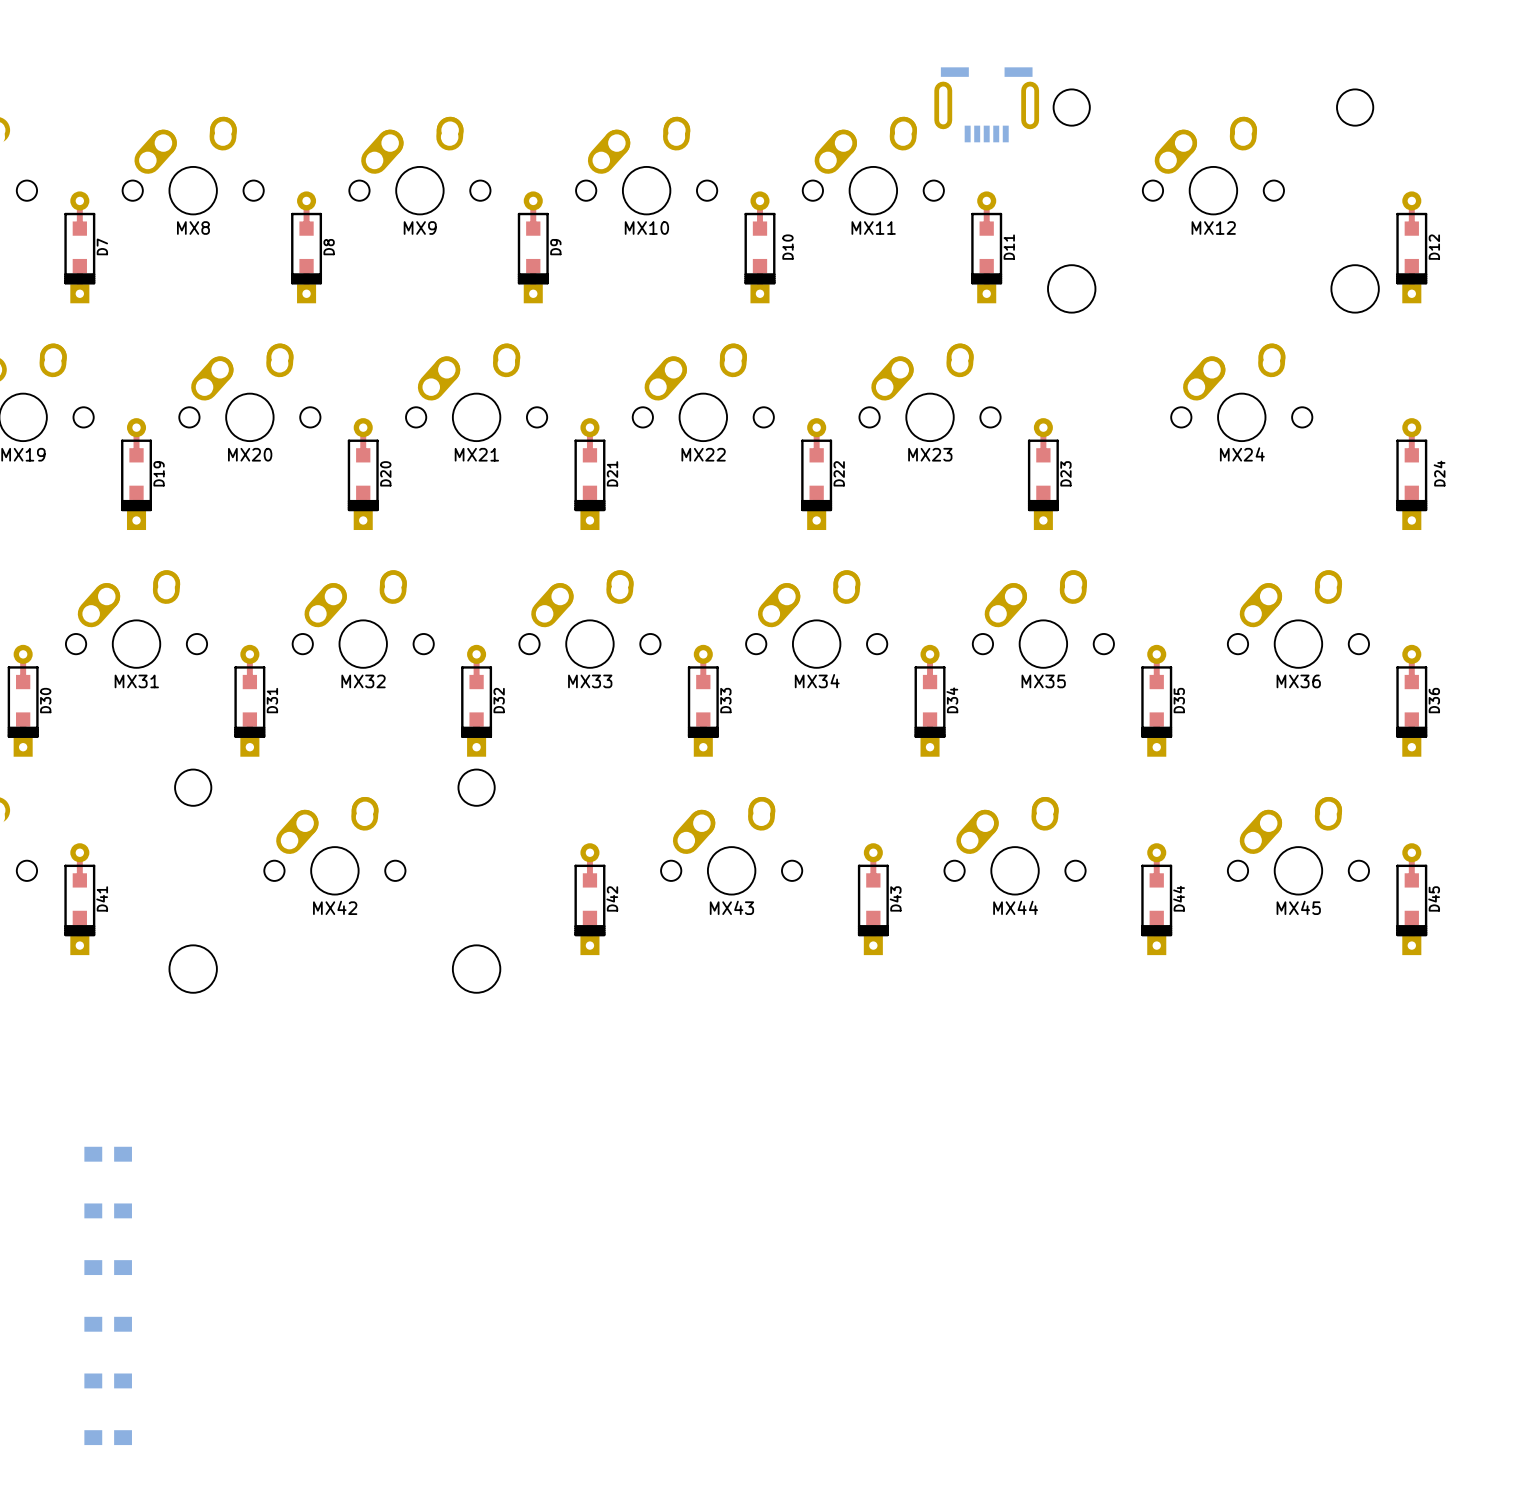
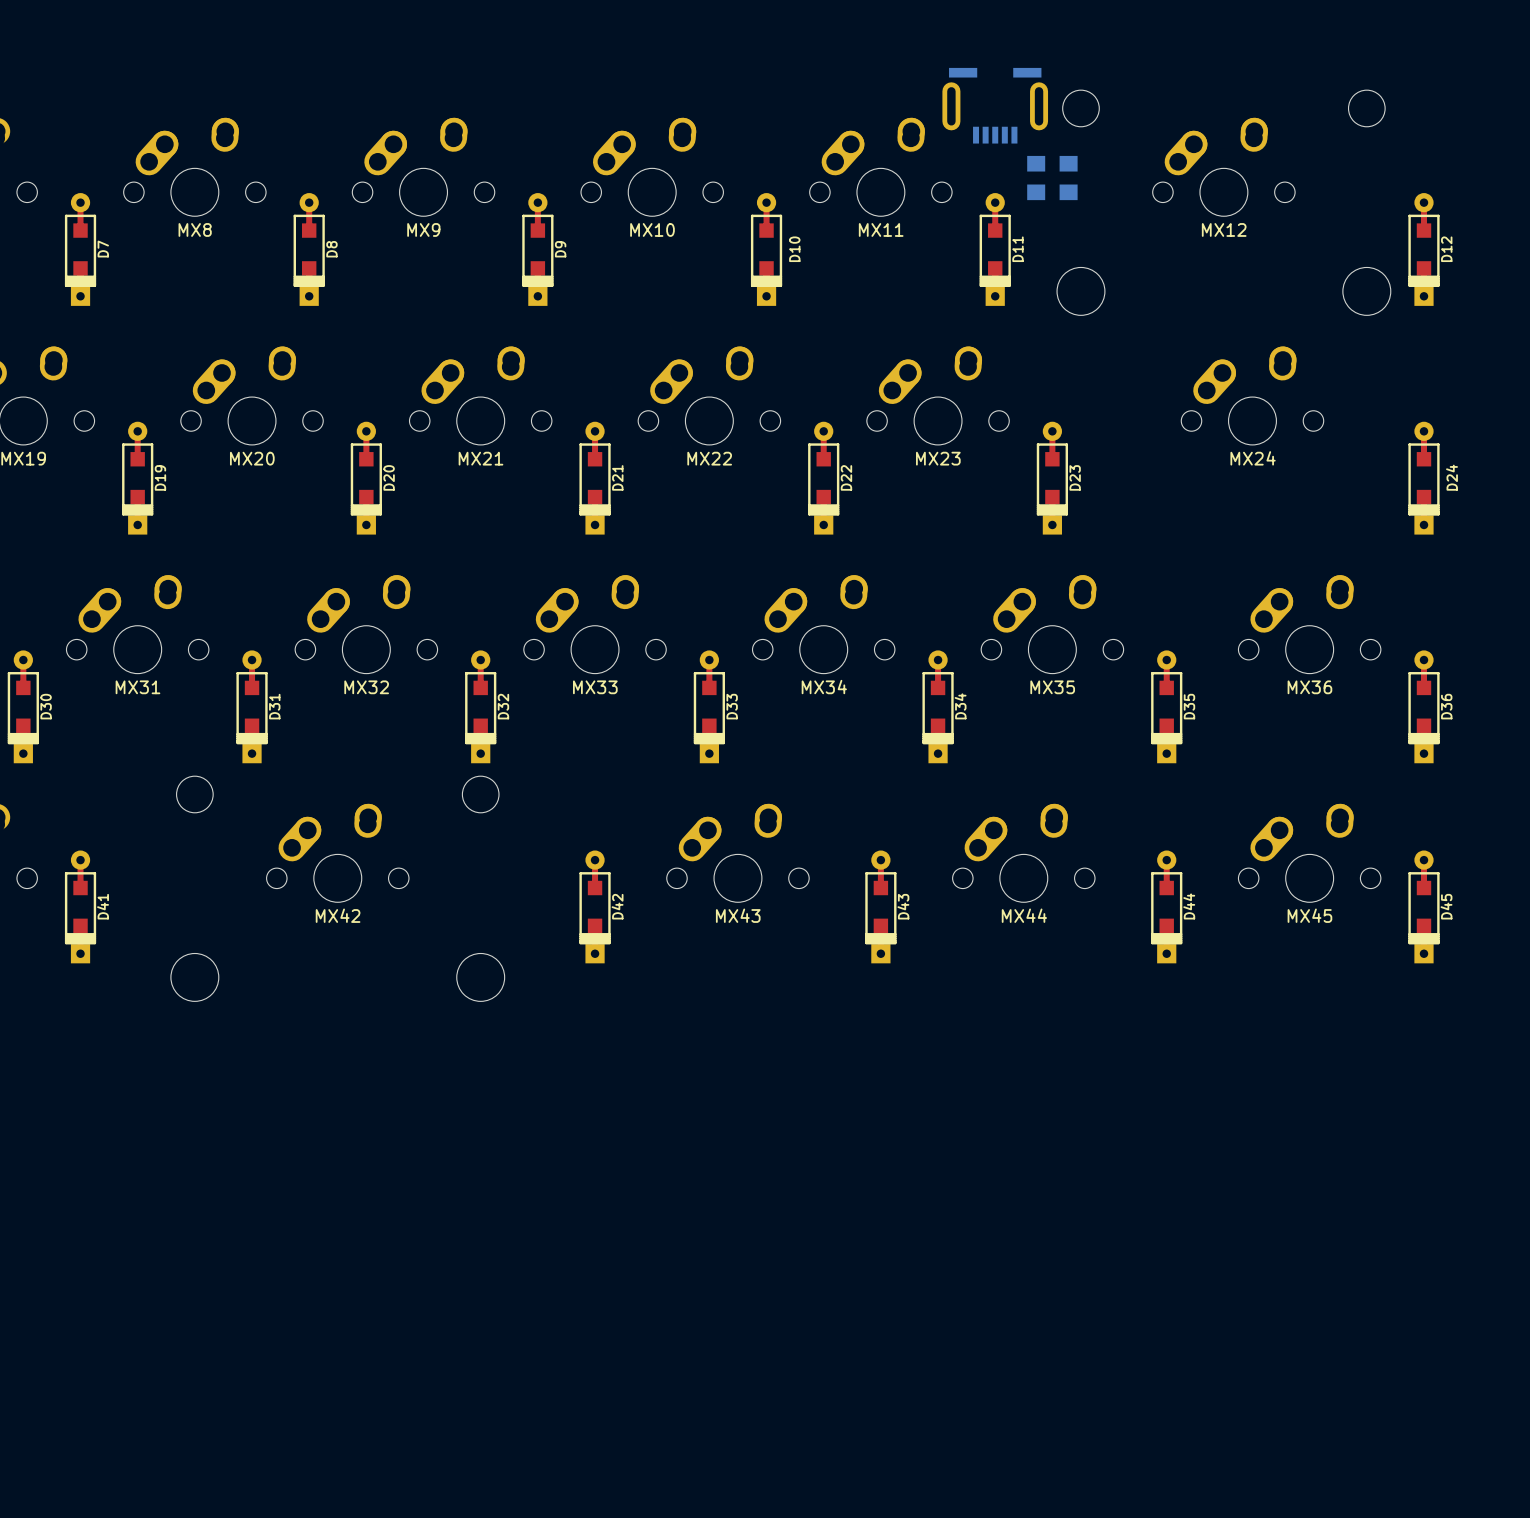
part: none -> (1052, 163)
part: none -> (1052, 192)
part: (108, 1154) -> none
part: (108, 1210) -> none
part: (108, 1267) -> none
part: (108, 1324) -> none
part: (108, 1380) -> none
part: (108, 1437) -> none

